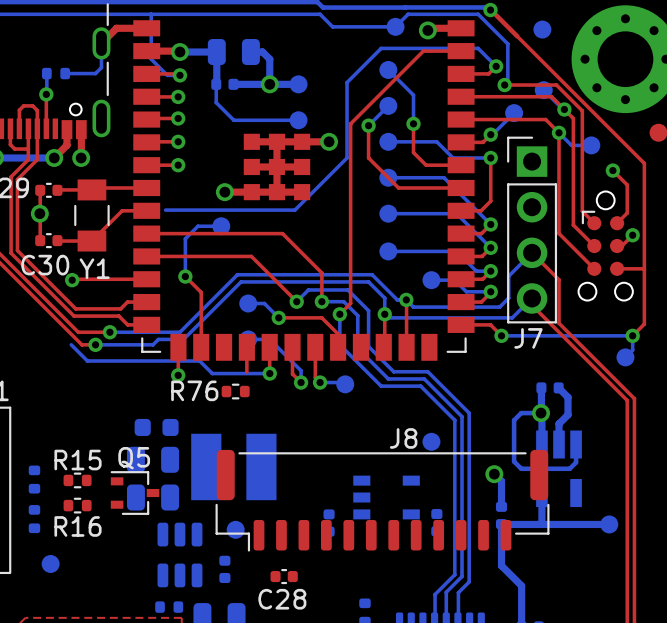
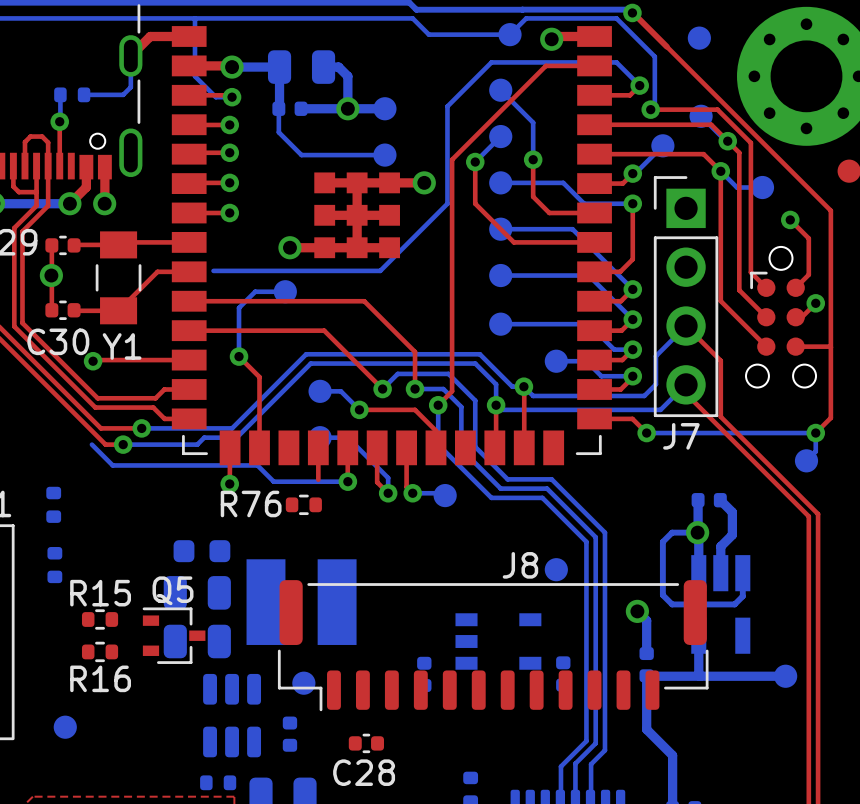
part: none -> (53, 504)
part: none -> (54, 565)
part: (34, 479) -> none
part: (34, 519) -> none

